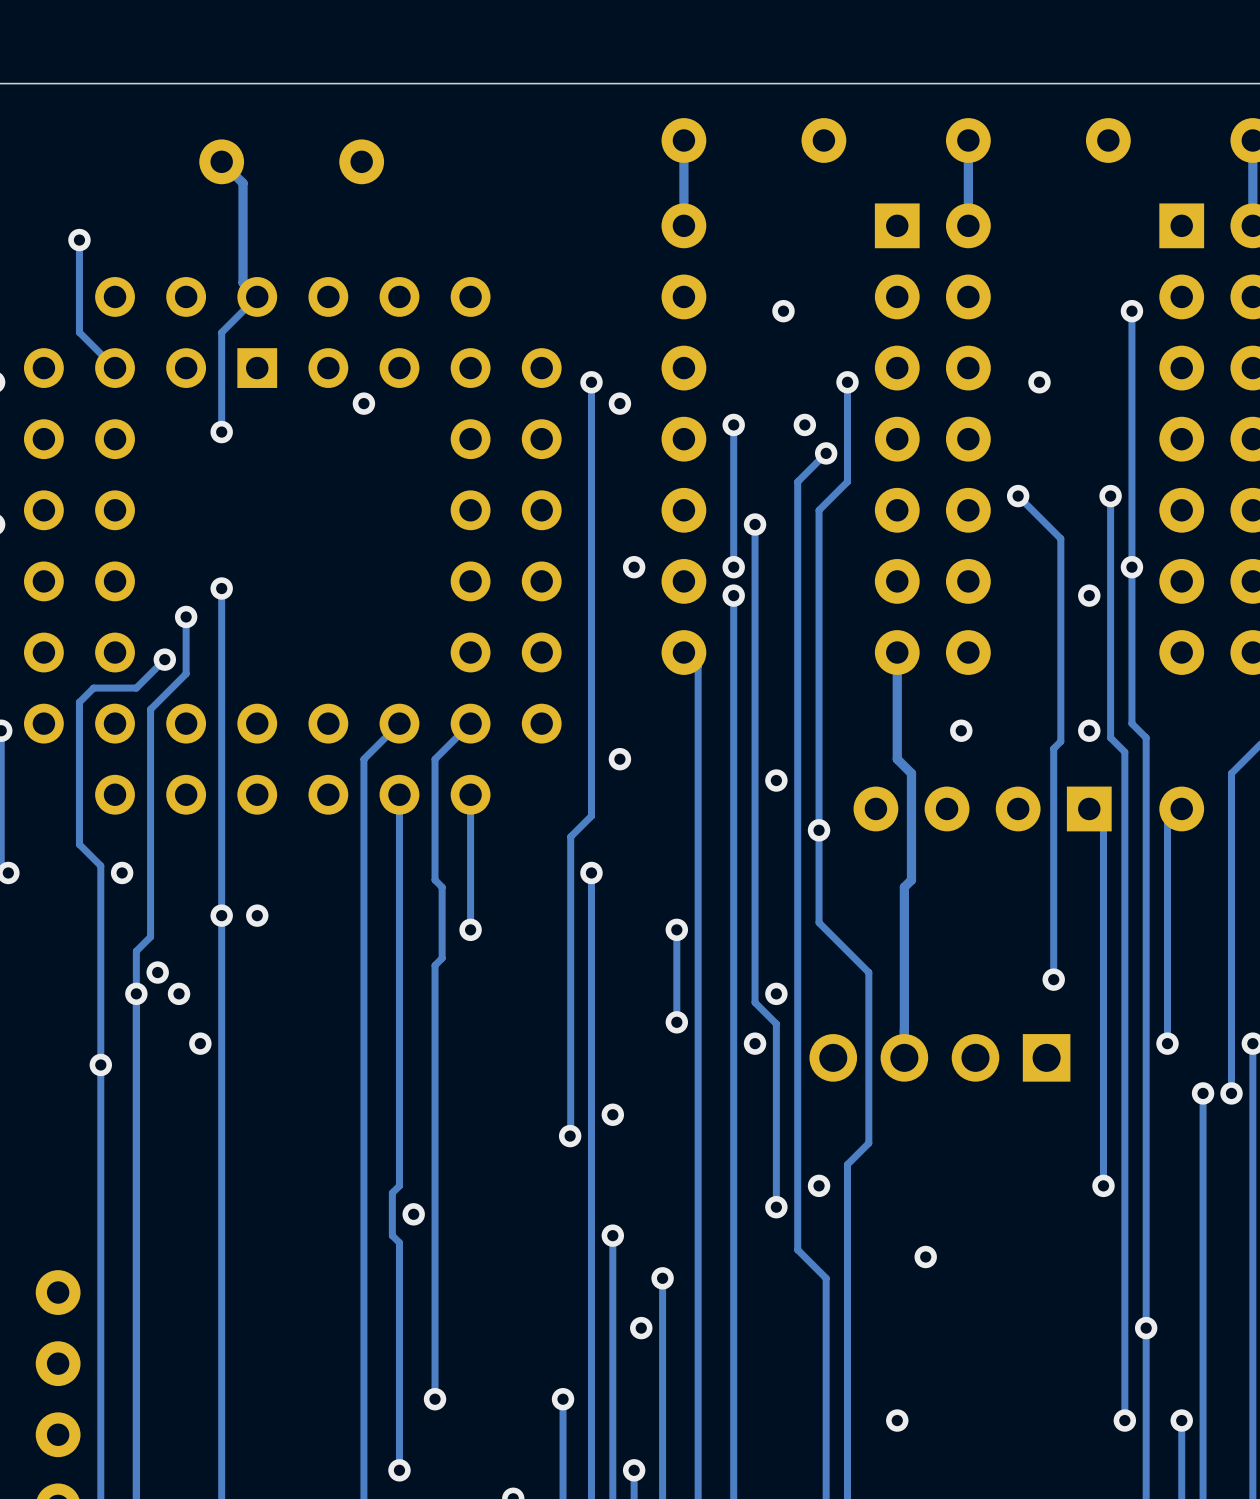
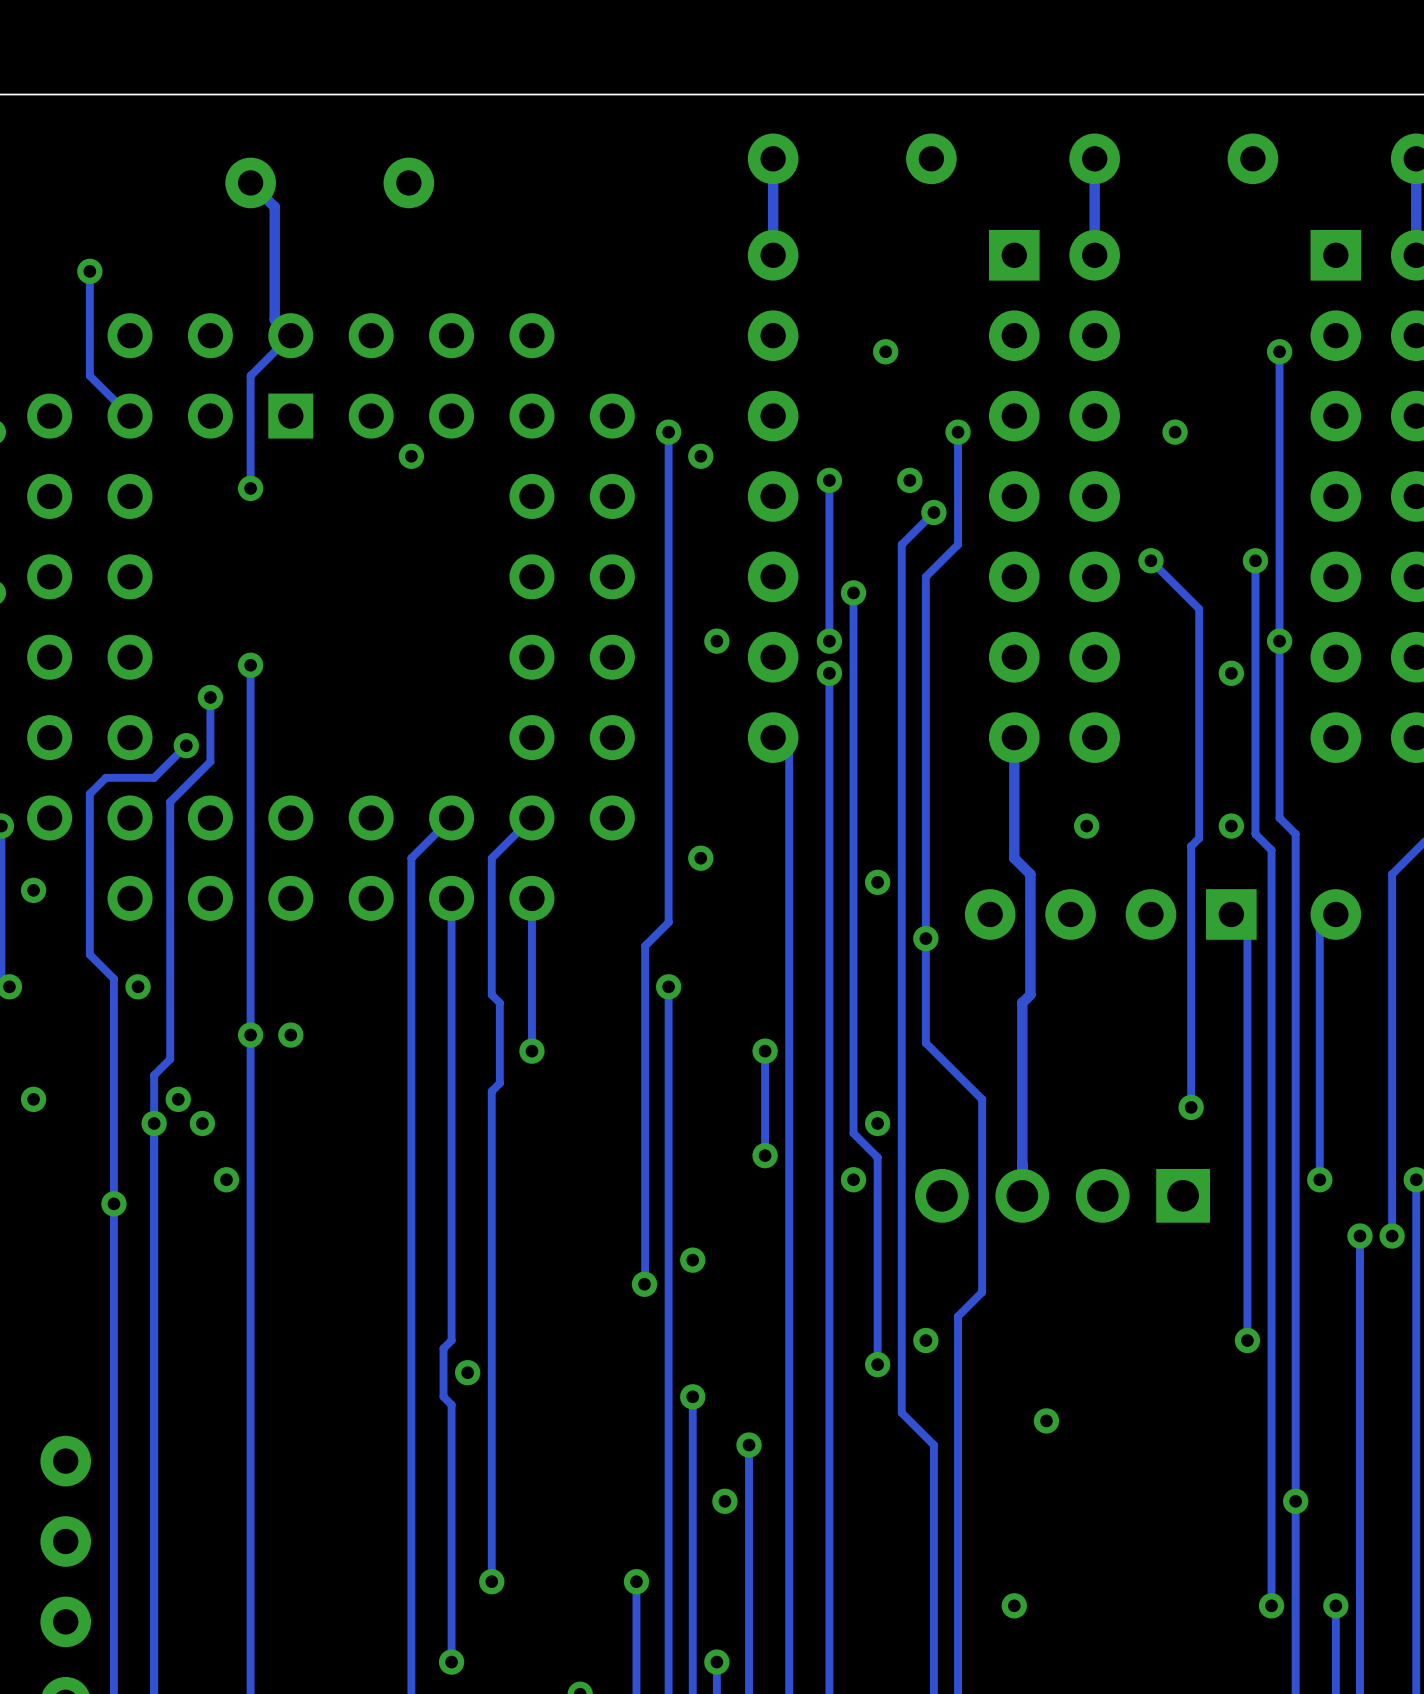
via: none -> (33, 890)
via: none -> (33, 1099)

